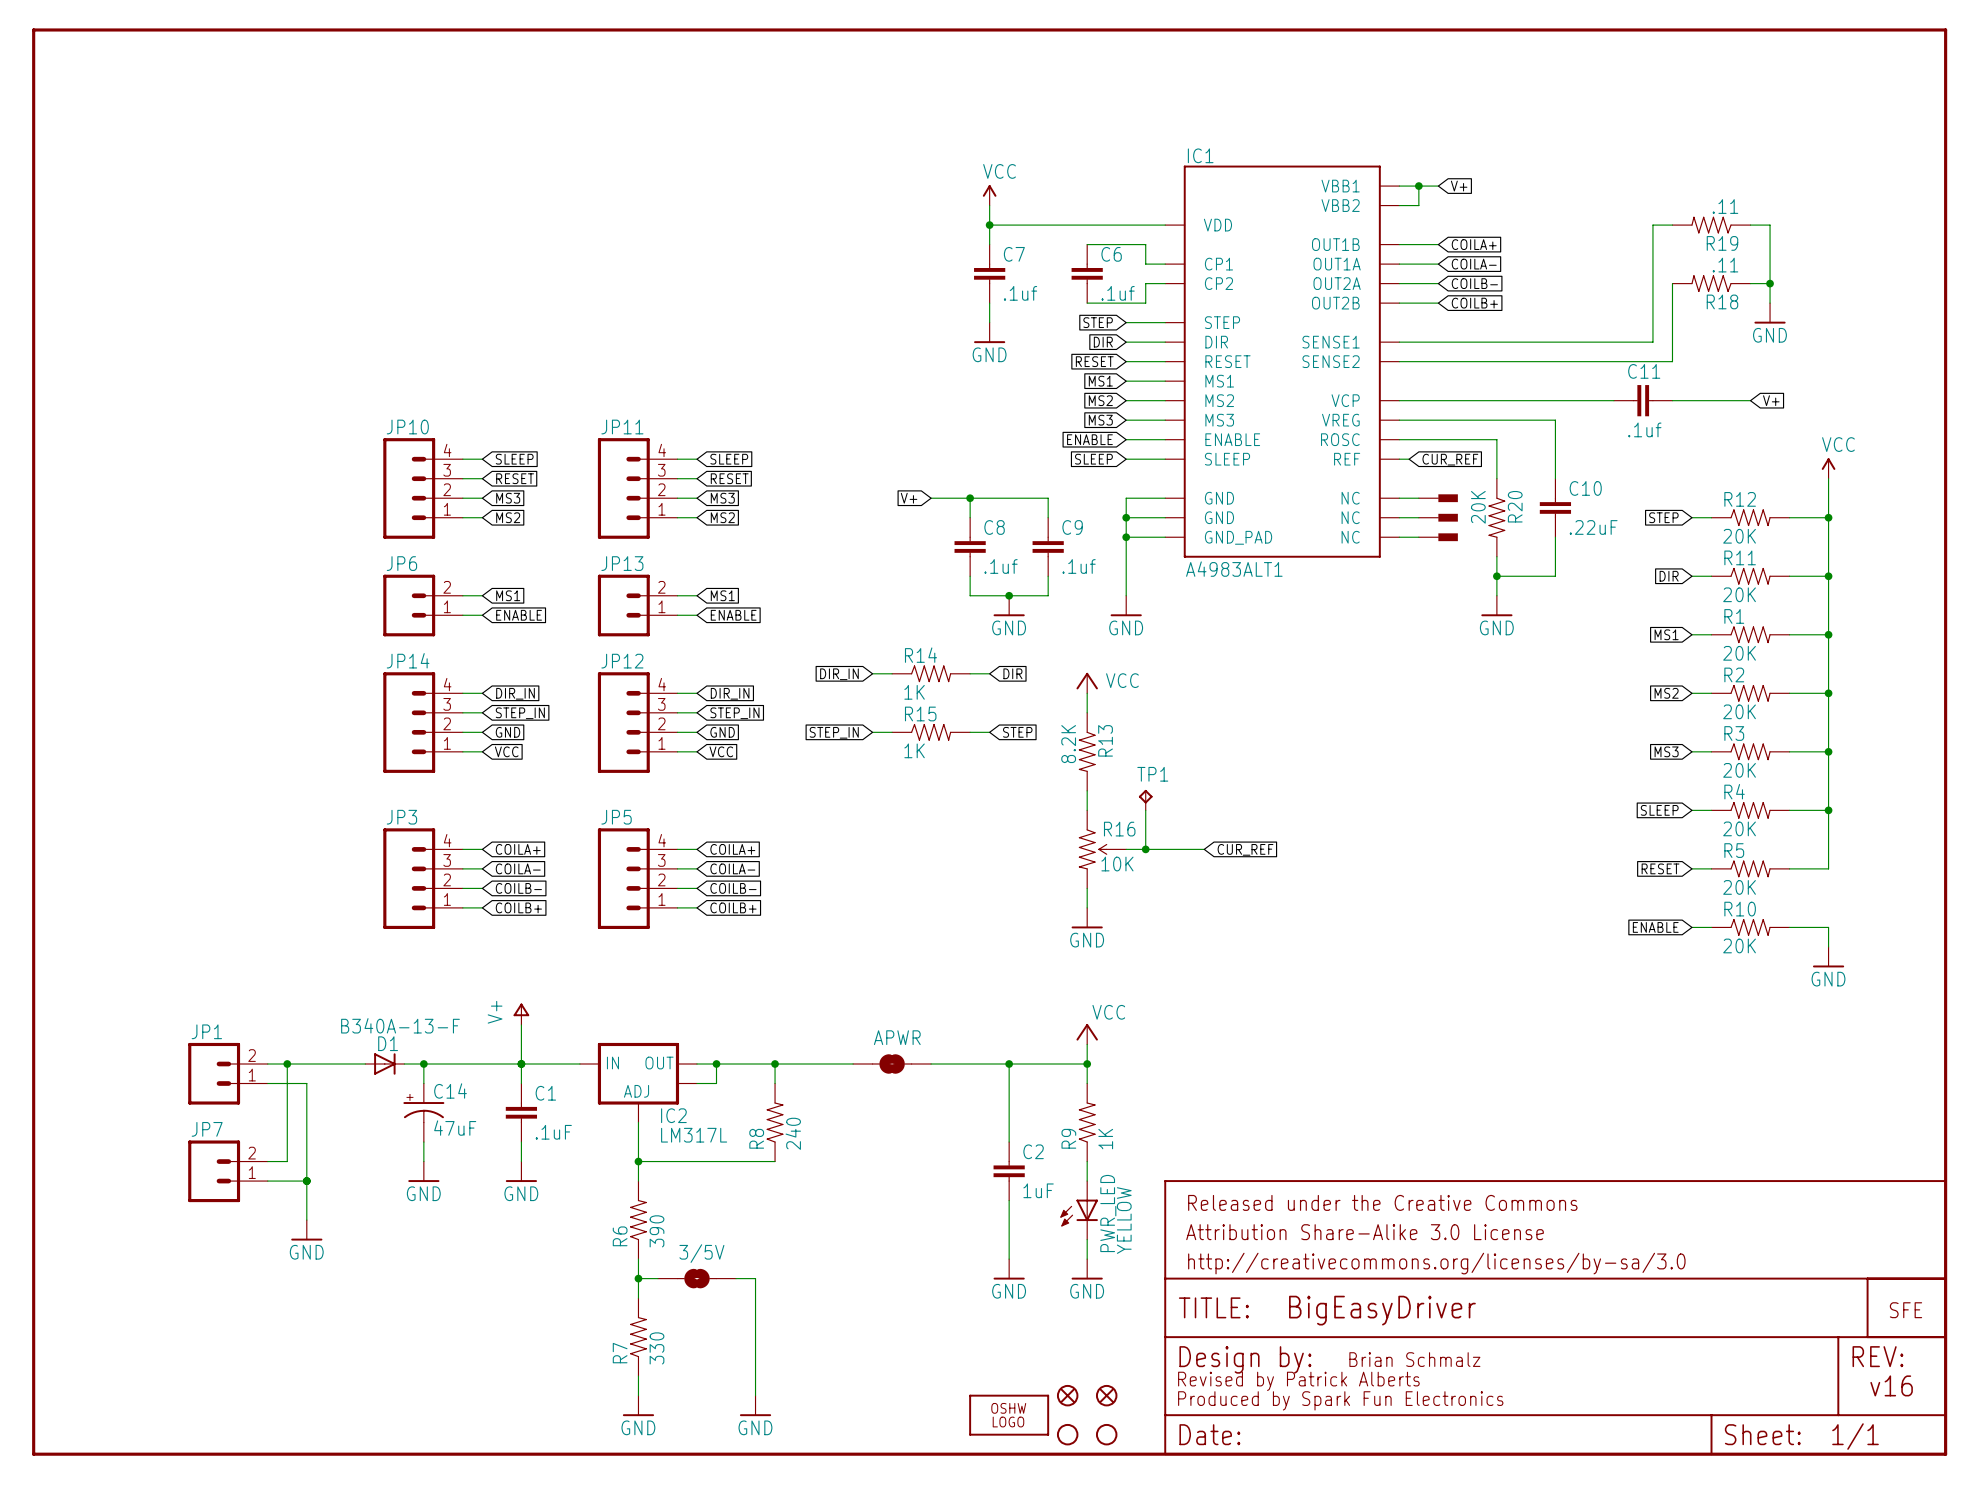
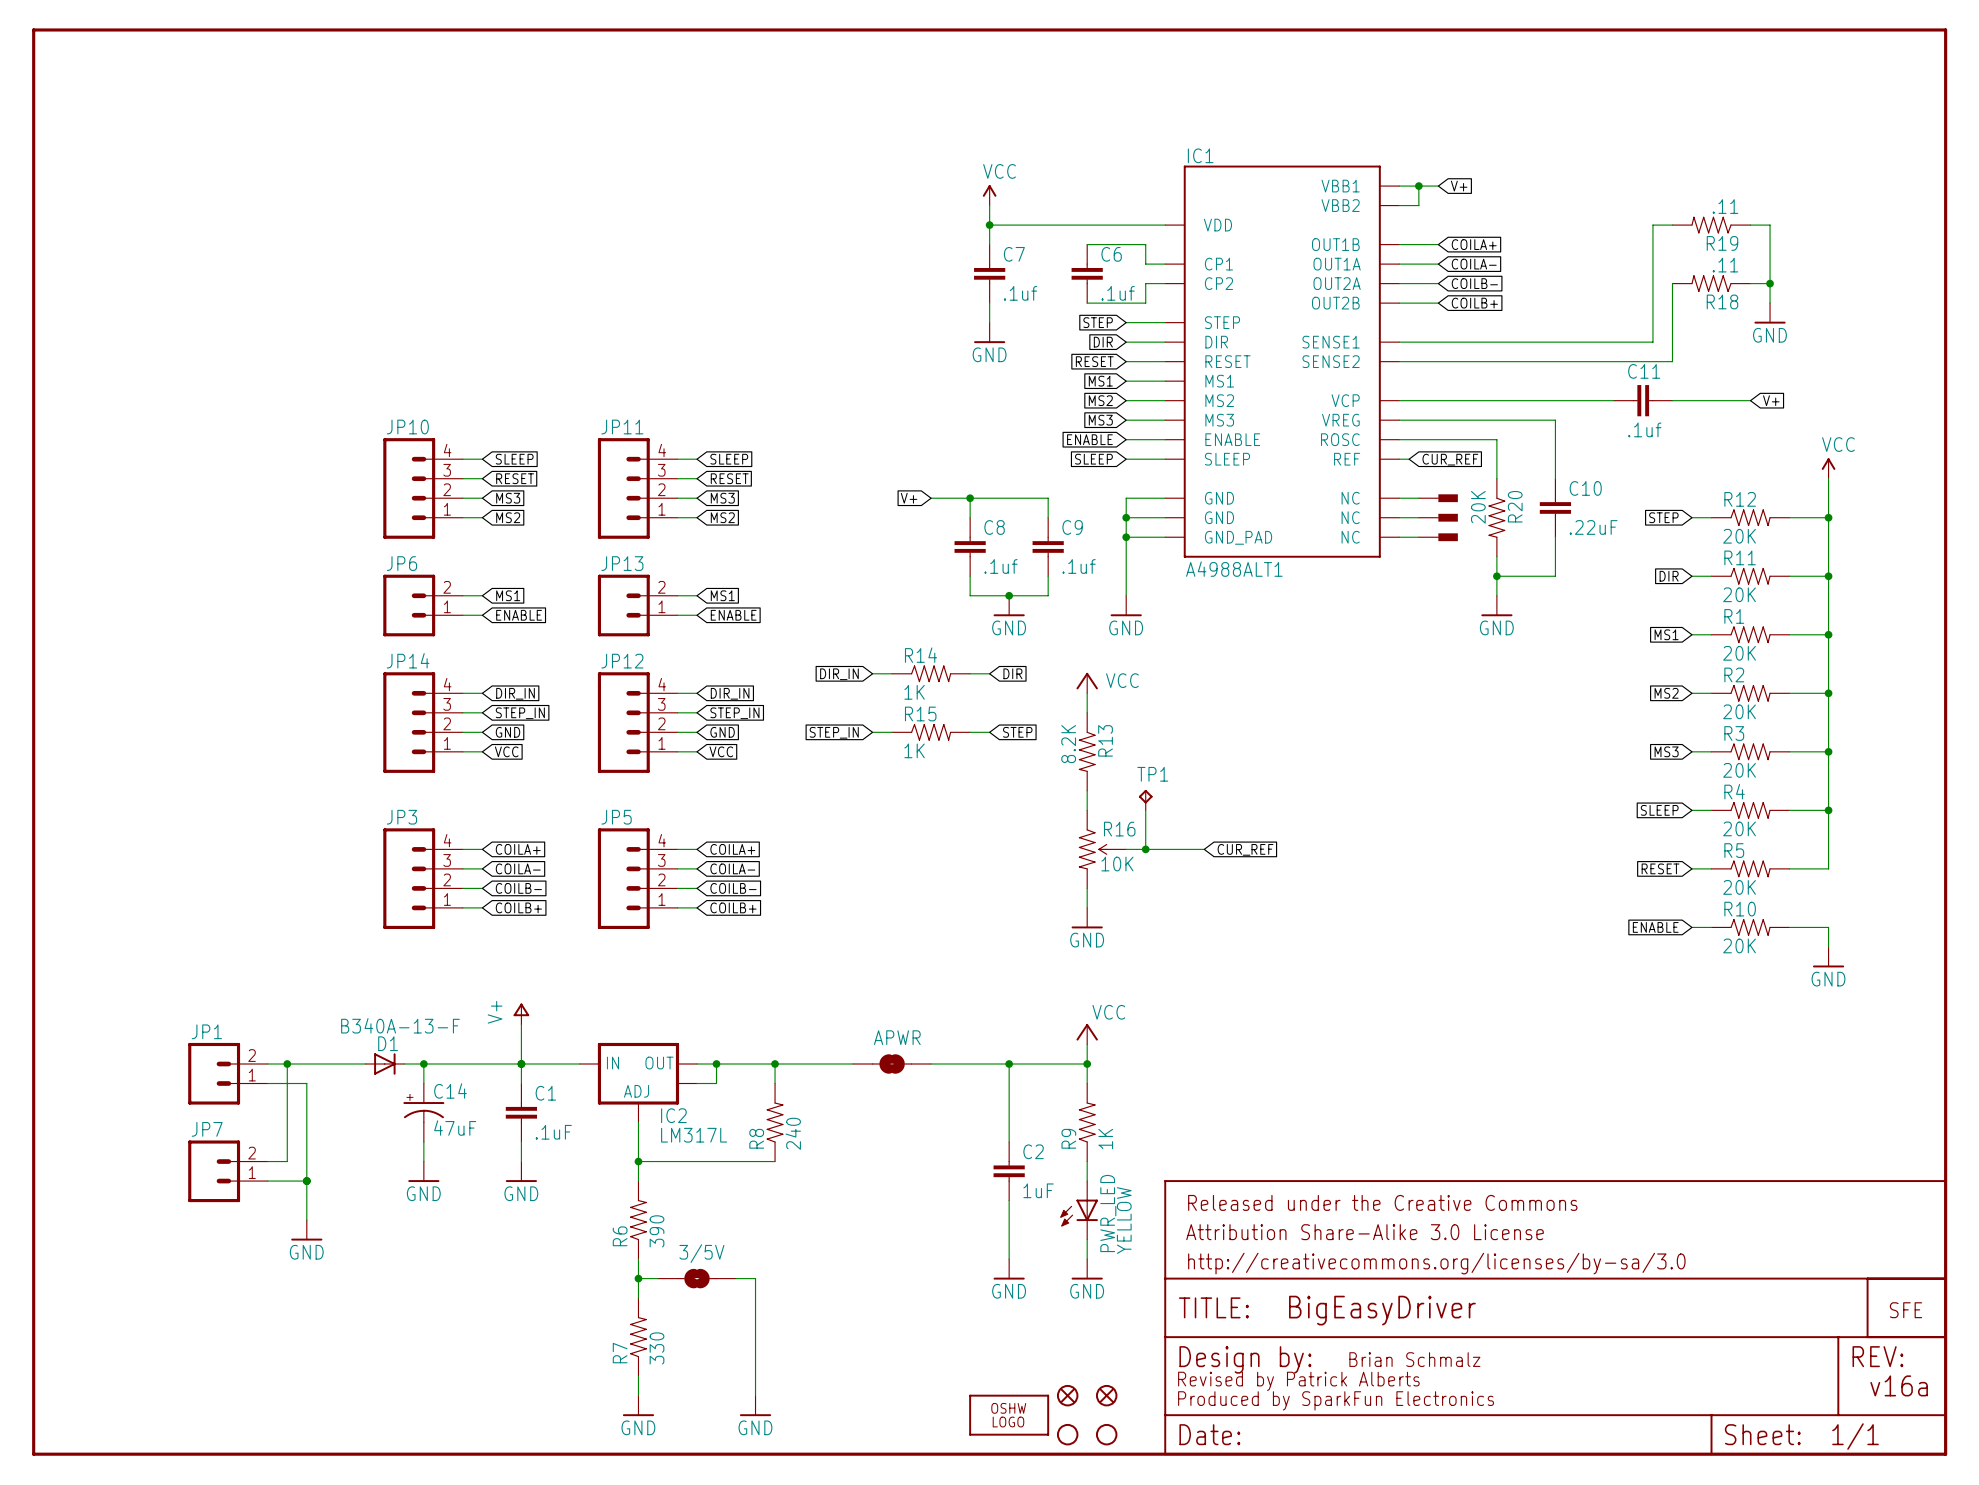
IC1 value: A4983ALT1 (1234, 569) -> A4988ALT1 (1234, 569)
text: v16 (1891, 1385) -> v16a (1899, 1385)
text: Produced by Spark Fun Electronics (1340, 1400) -> Produced by SparkFun Electronics (1336, 1400)

